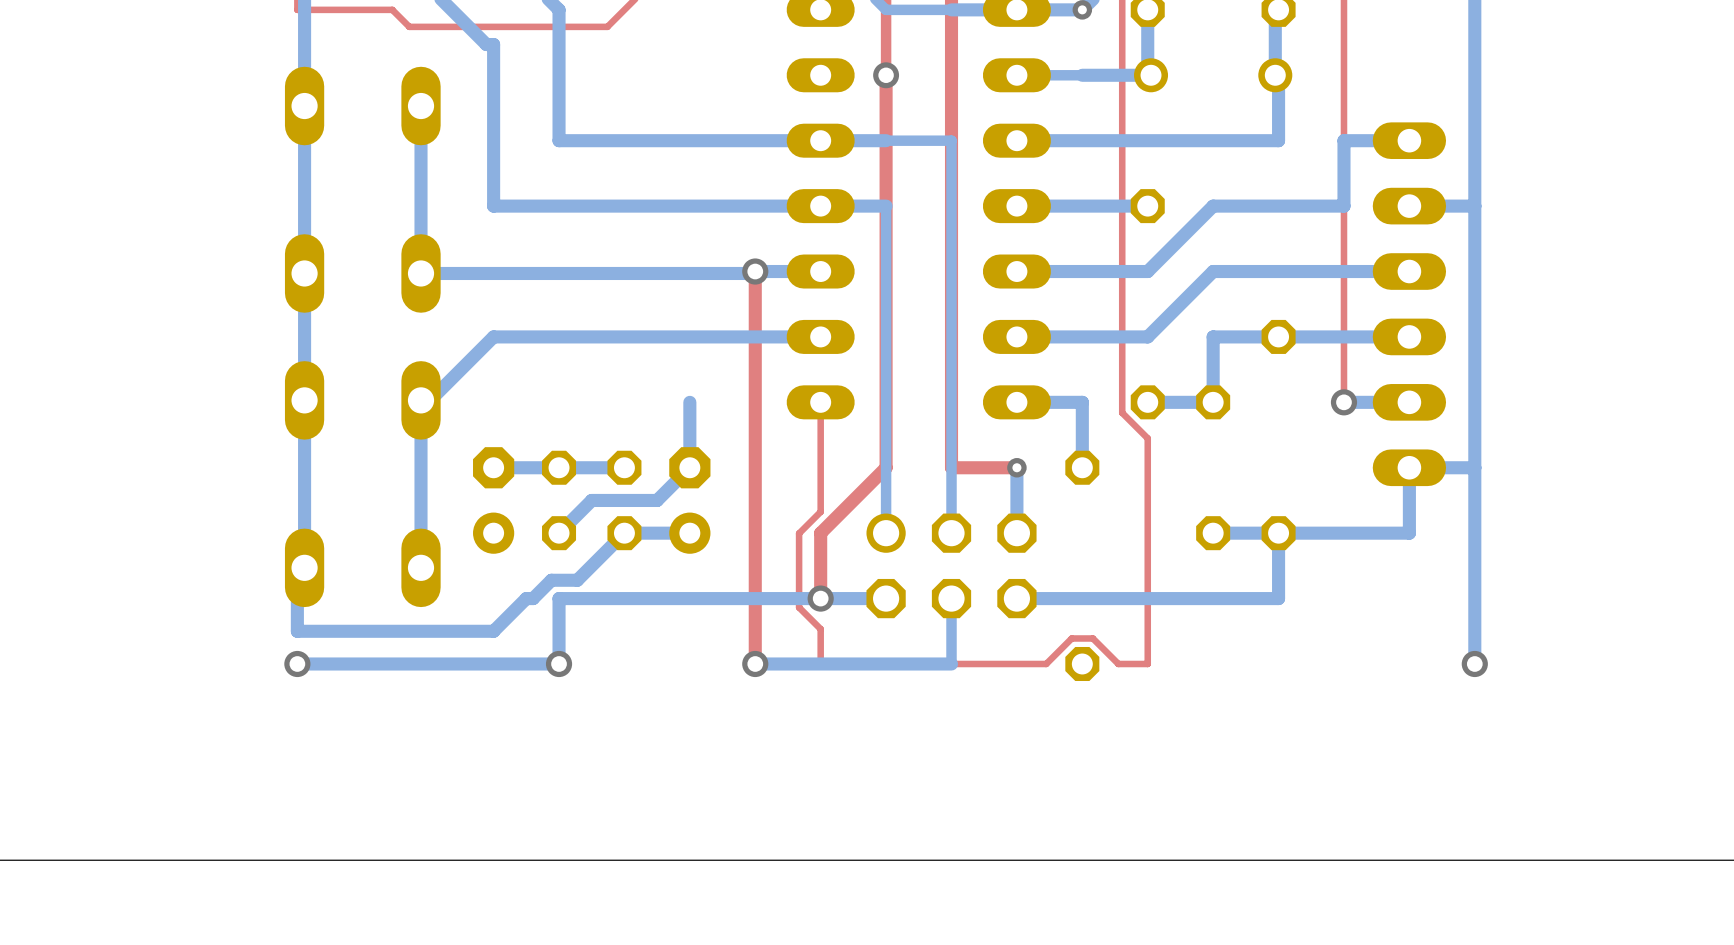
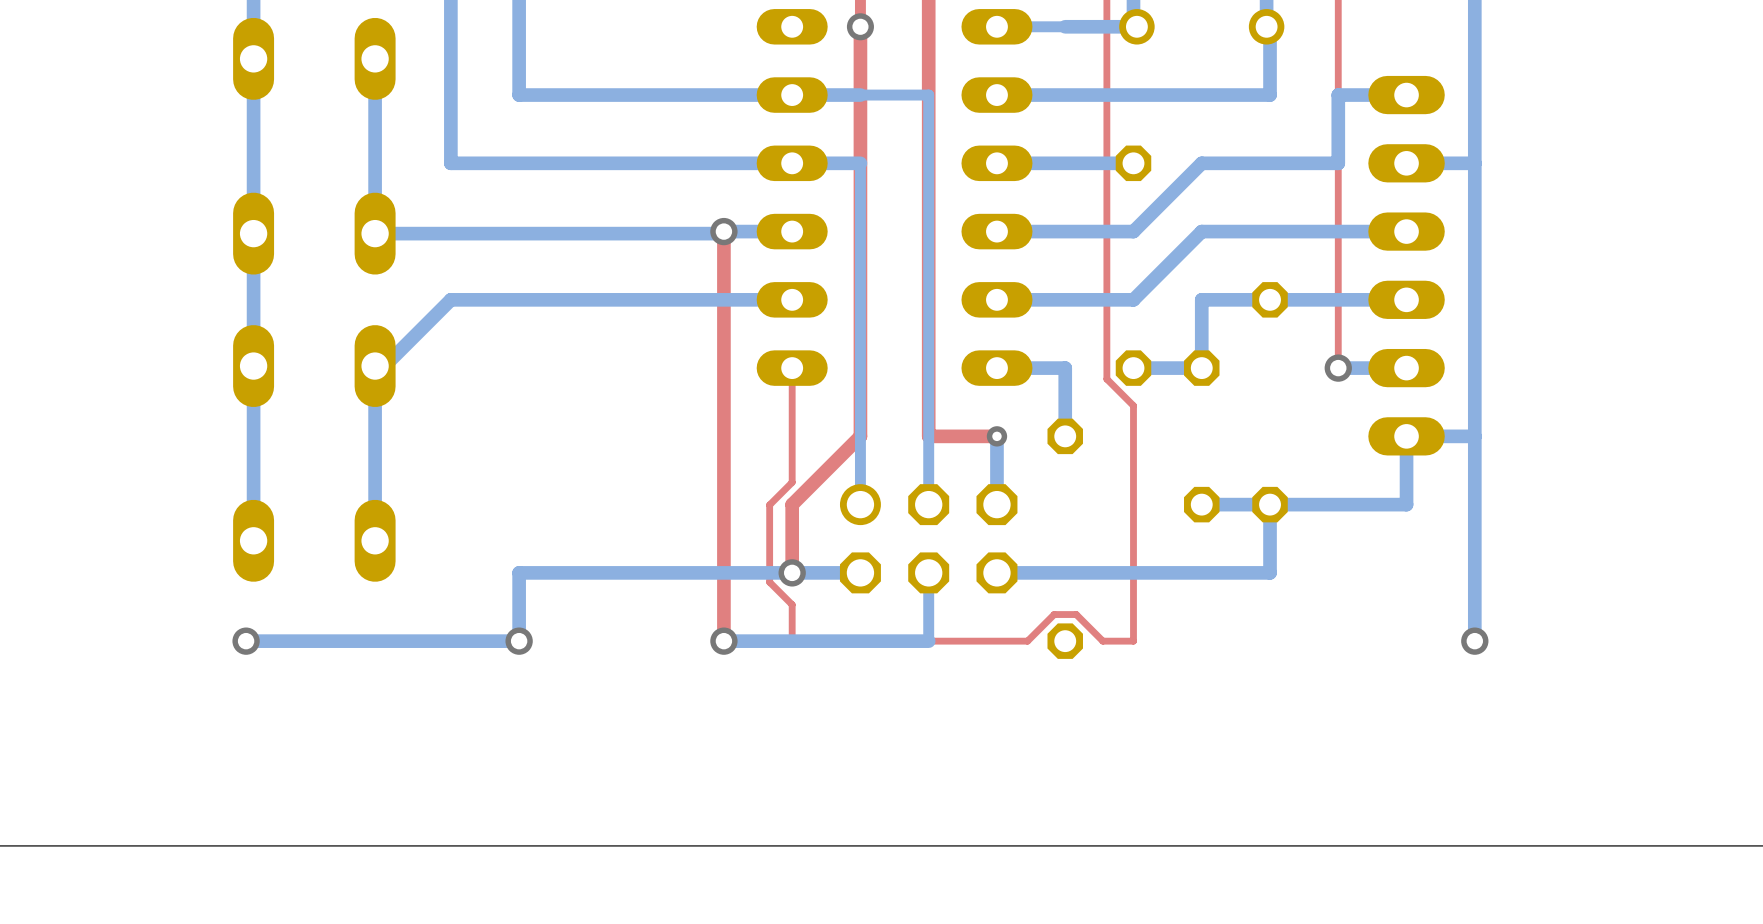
bottom track: (689, 402) (689, 467) (657, 500) (591, 500) (559, 533) -> none
bottom track: (624, 467) (493, 467) -> none
part: (493, 500) -> none
part: (559, 500) -> none
part: (624, 500) -> none
part: (689, 500) -> none
bottom track: (689, 533) (624, 533) (577, 580) (551, 580) (533, 598) (526, 598) (493, 631) (297, 631) (297, 575) (304, 567) -> none

